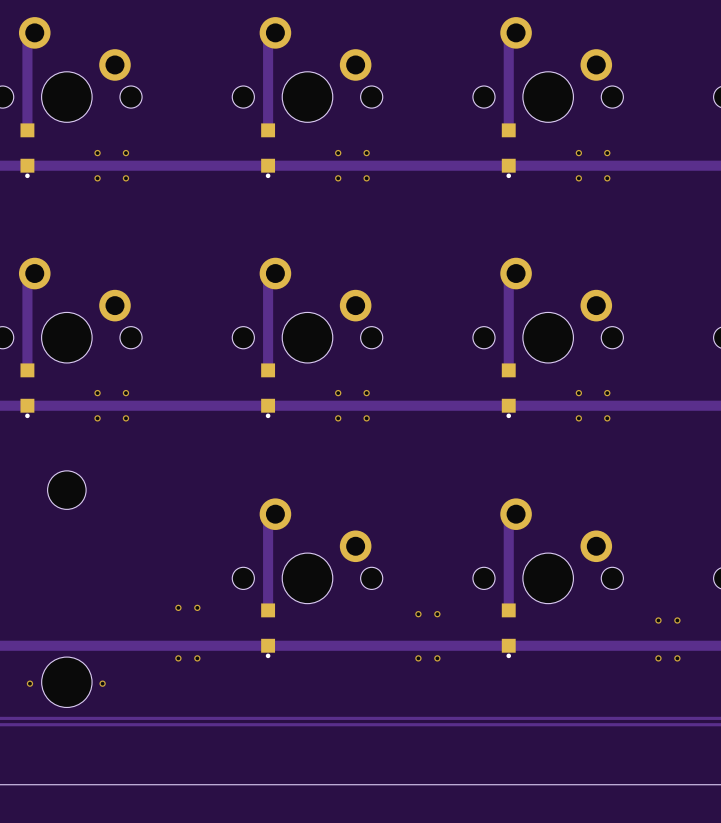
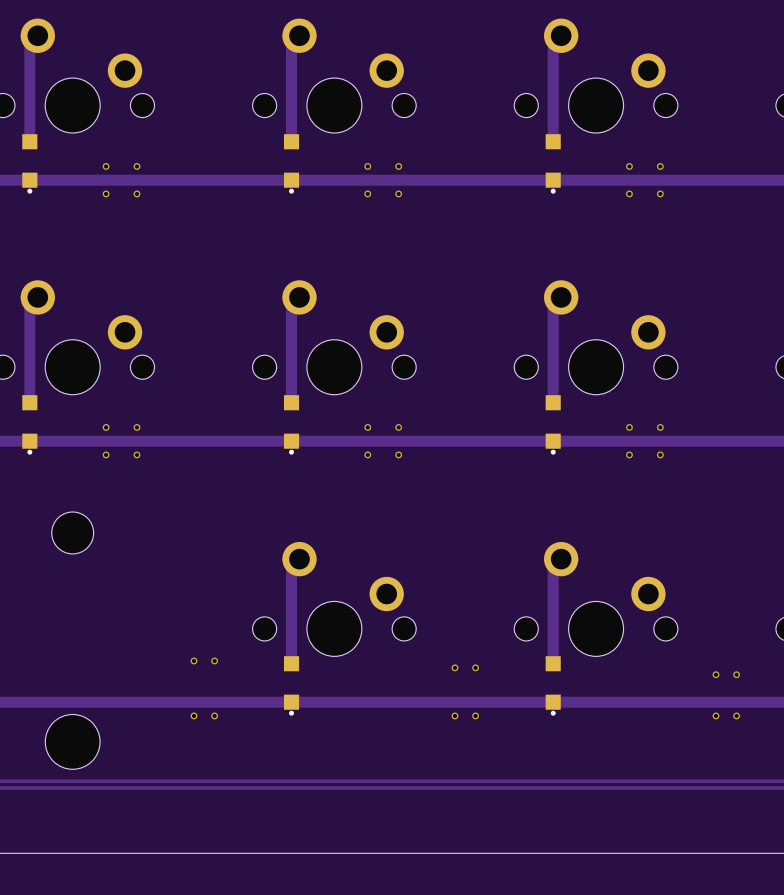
via: (29, 683) -> none
via: (102, 683) -> none

